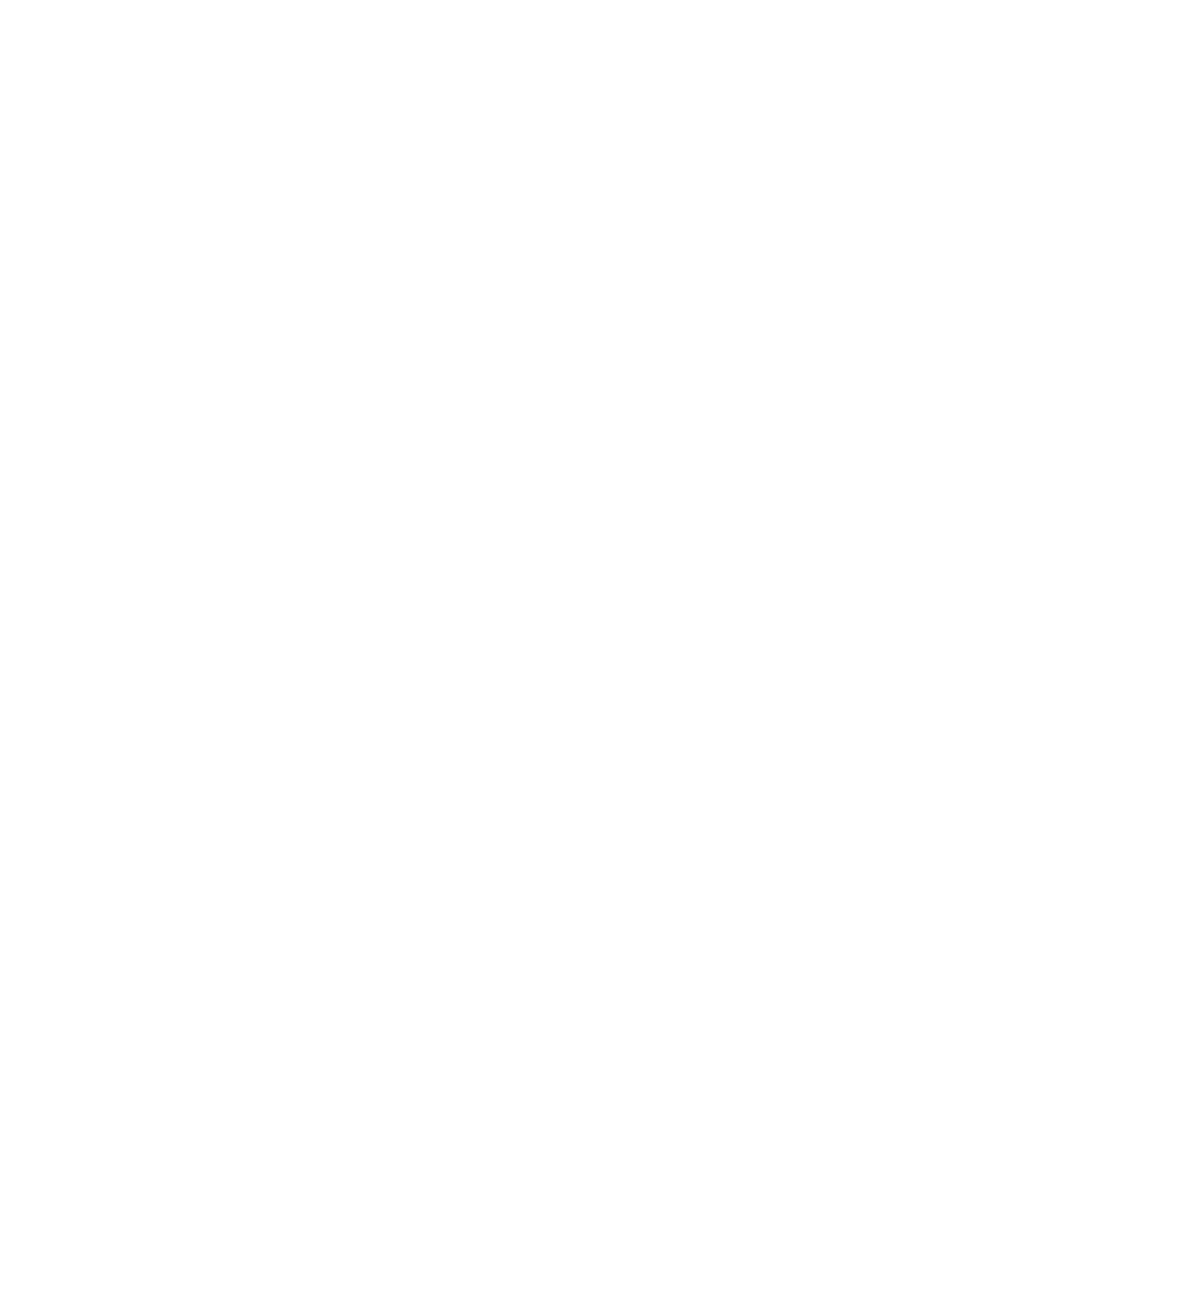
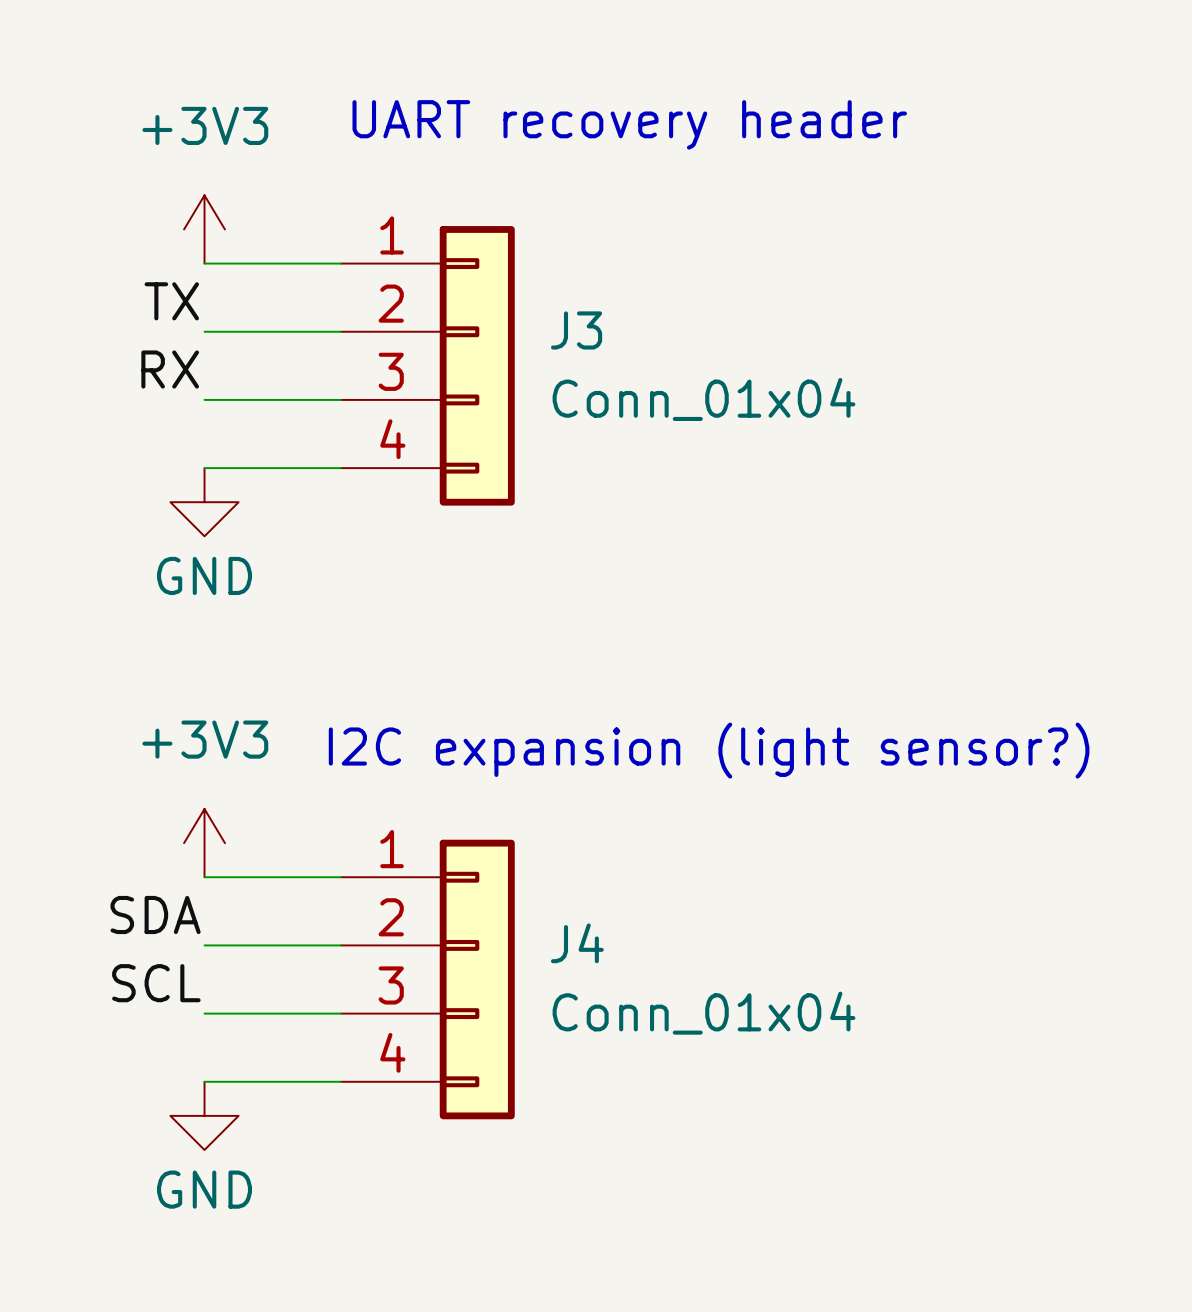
text: none -> UART recovery header (629, 124)
power symbol: none -> +3V3 (204, 229)
wire: none -> (204, 263) (340, 263)
label: none -> TX (171, 301)
wire: none -> (204, 331) (340, 331)
J3: none -> Conn_01x04 (427, 365)
label: none -> RX (170, 369)
wire: none -> (204, 399) (340, 399)
wire: none -> (204, 468) (340, 468)
power symbol: none -> GND (204, 502)
text: none -> I2C expansion (light sensor?) (709, 750)
power symbol: none -> +3V3 (204, 843)
wire: none -> (204, 877) (340, 877)
label: none -> SDA (155, 914)
wire: none -> (204, 945) (340, 945)
J4: none -> Conn_01x04 (427, 979)
label: none -> SCL (156, 983)
wire: none -> (204, 1013) (340, 1013)
wire: none -> (204, 1081) (340, 1081)
power symbol: none -> GND (204, 1115)

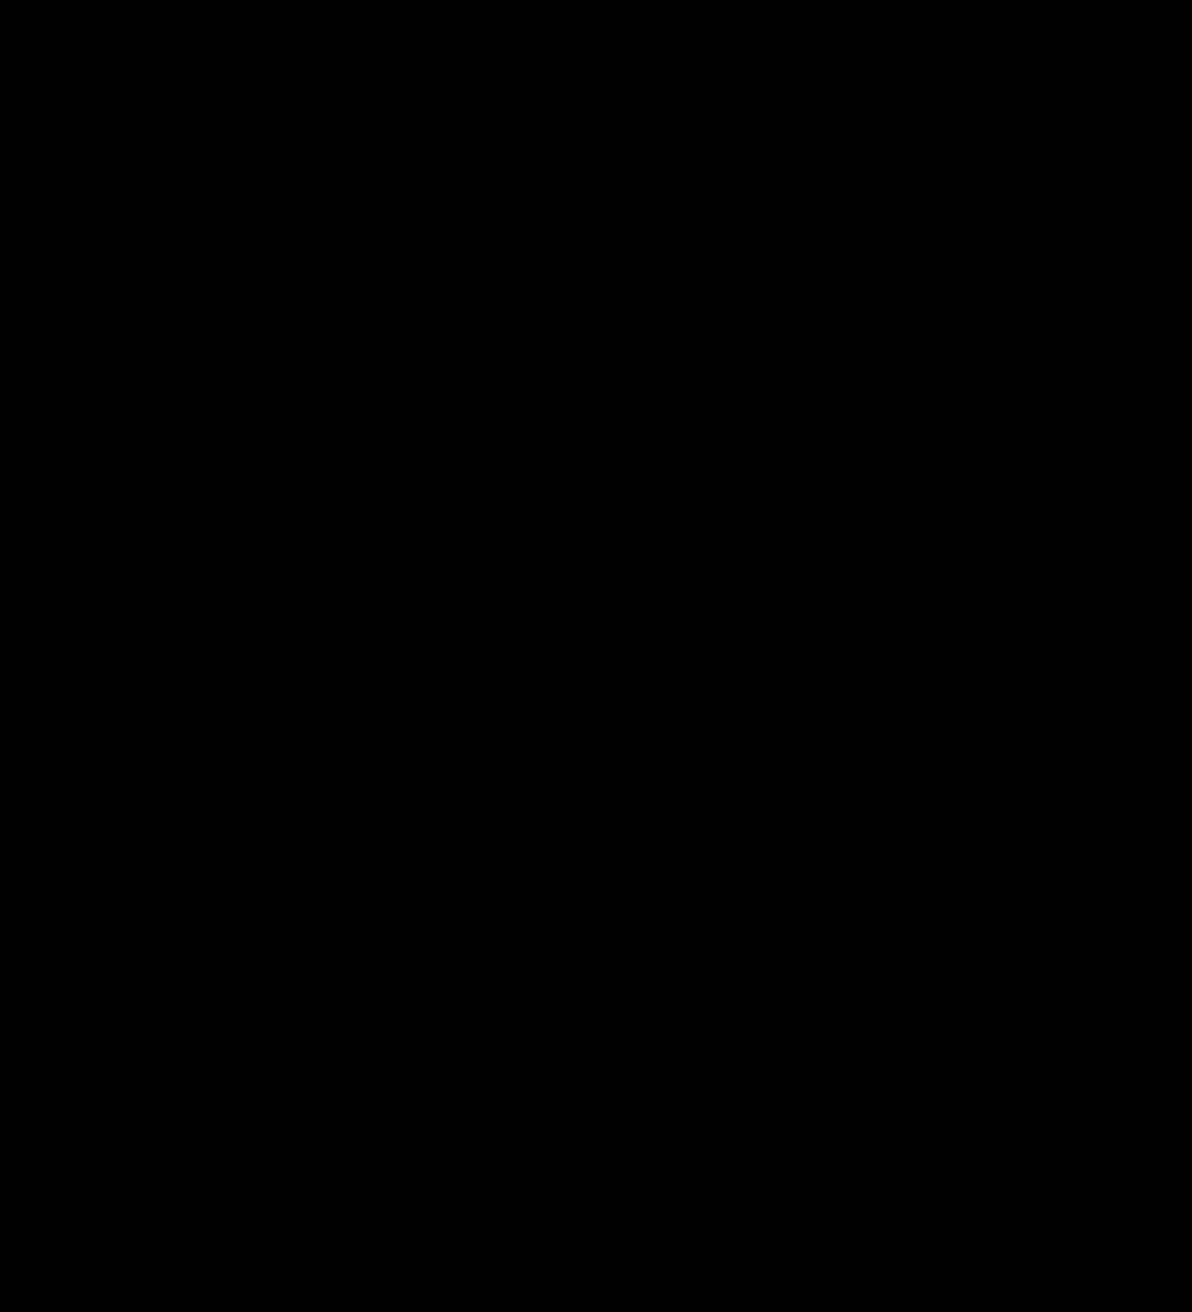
text: UART recovery header (629, 124) -> none
power symbol: +3V3 (204, 229) -> none
wire: (204, 263) (340, 263) -> none
label: TX (171, 301) -> none
wire: (204, 331) (340, 331) -> none
J3: Conn_01x04 (427, 365) -> none
label: RX (170, 369) -> none
wire: (204, 399) (340, 399) -> none
wire: (204, 468) (340, 468) -> none
power symbol: GND (204, 502) -> none
text: I2C expansion (light sensor?) (709, 750) -> none
power symbol: +3V3 (204, 843) -> none
wire: (204, 877) (340, 877) -> none
label: SDA (155, 914) -> none
wire: (204, 945) (340, 945) -> none
J4: Conn_01x04 (427, 979) -> none
label: SCL (156, 983) -> none
wire: (204, 1013) (340, 1013) -> none
wire: (204, 1081) (340, 1081) -> none
power symbol: GND (204, 1115) -> none

